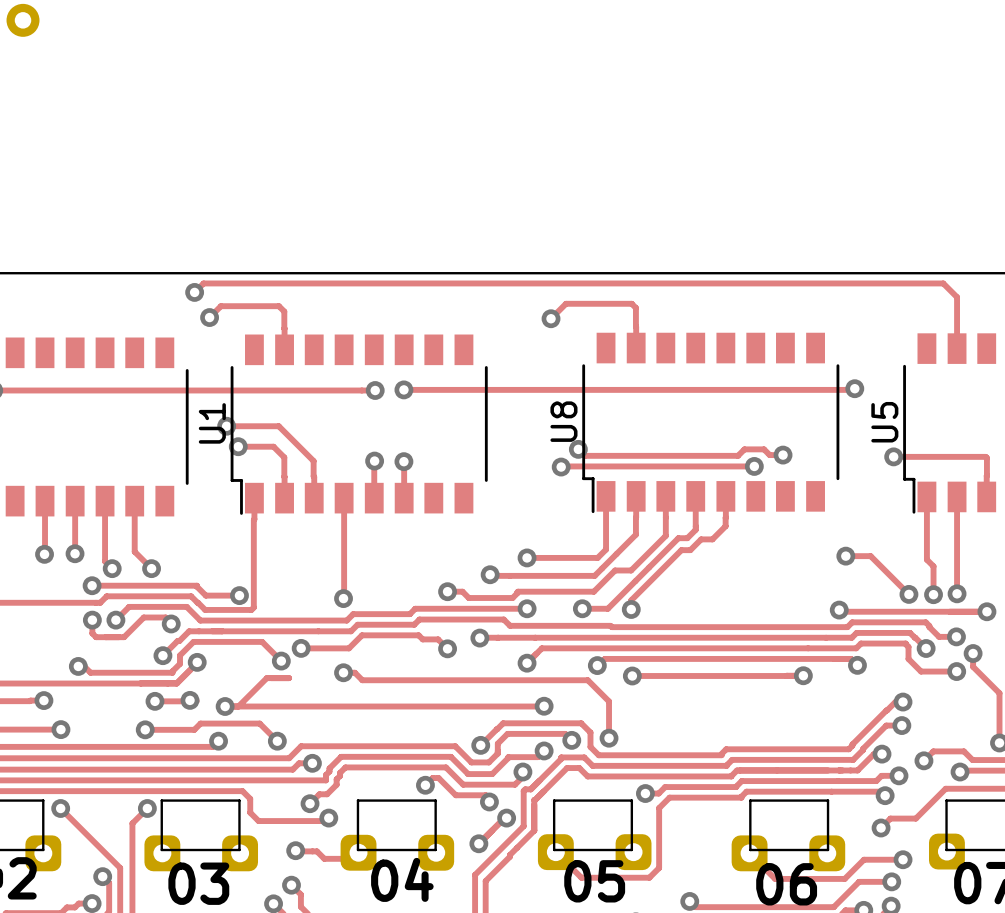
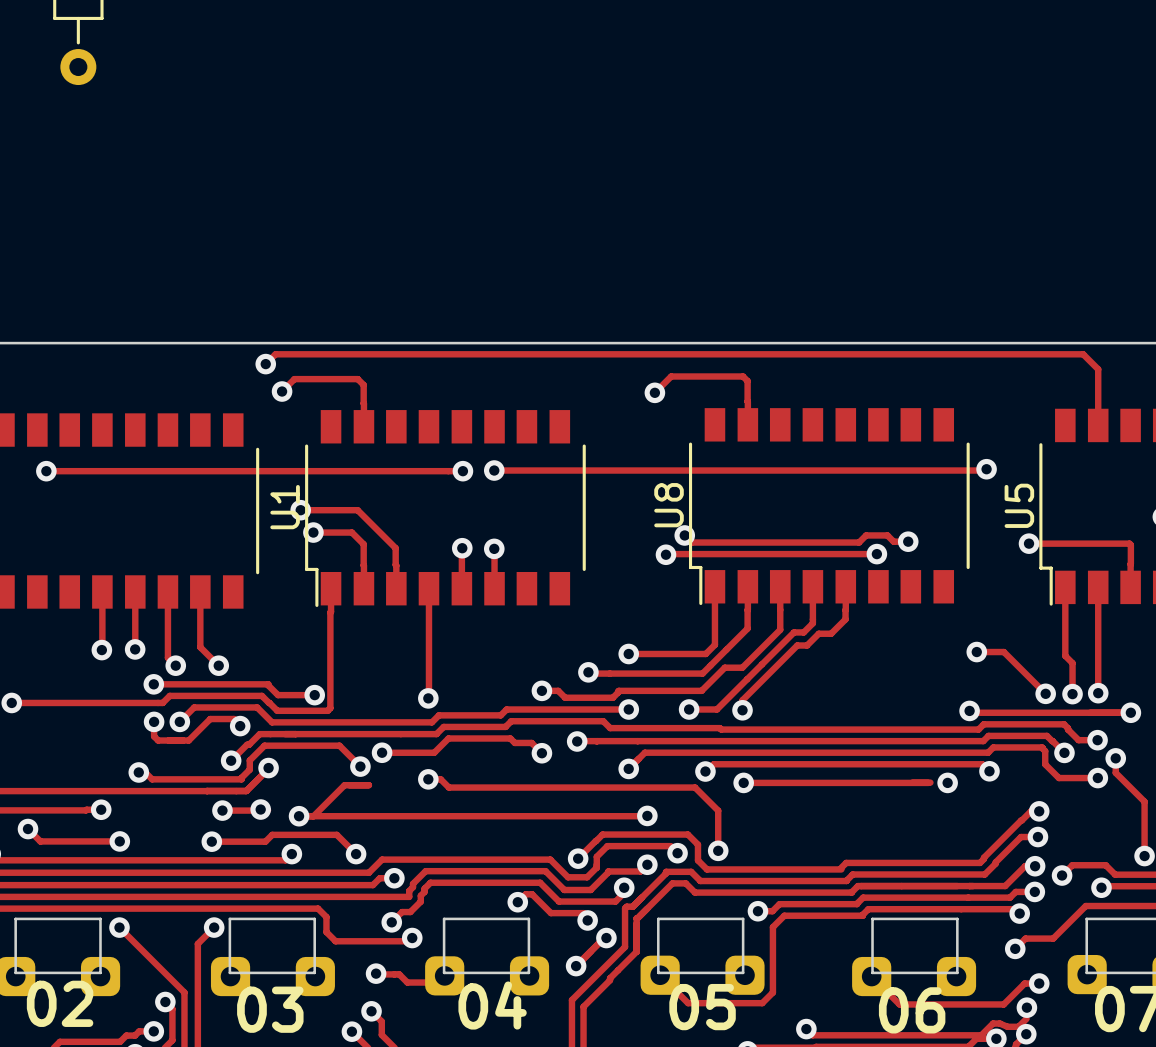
via position: (803, 675) -> (947, 782)
track: (882, 754) (873, 754) (857, 770) -> (1035, 866) (1025, 866) (1005, 886) (989, 886)
via position: (882, 754) -> (1035, 866)
track: (889, 859) (863, 859) (844, 878) -> (1024, 983) (1003, 1004) (975, 1004)
track: (891, 881) (859, 881) (833, 907) -> (1026, 1018) (1018, 1026) (993, 1023) (981, 1035) (963, 1035)

